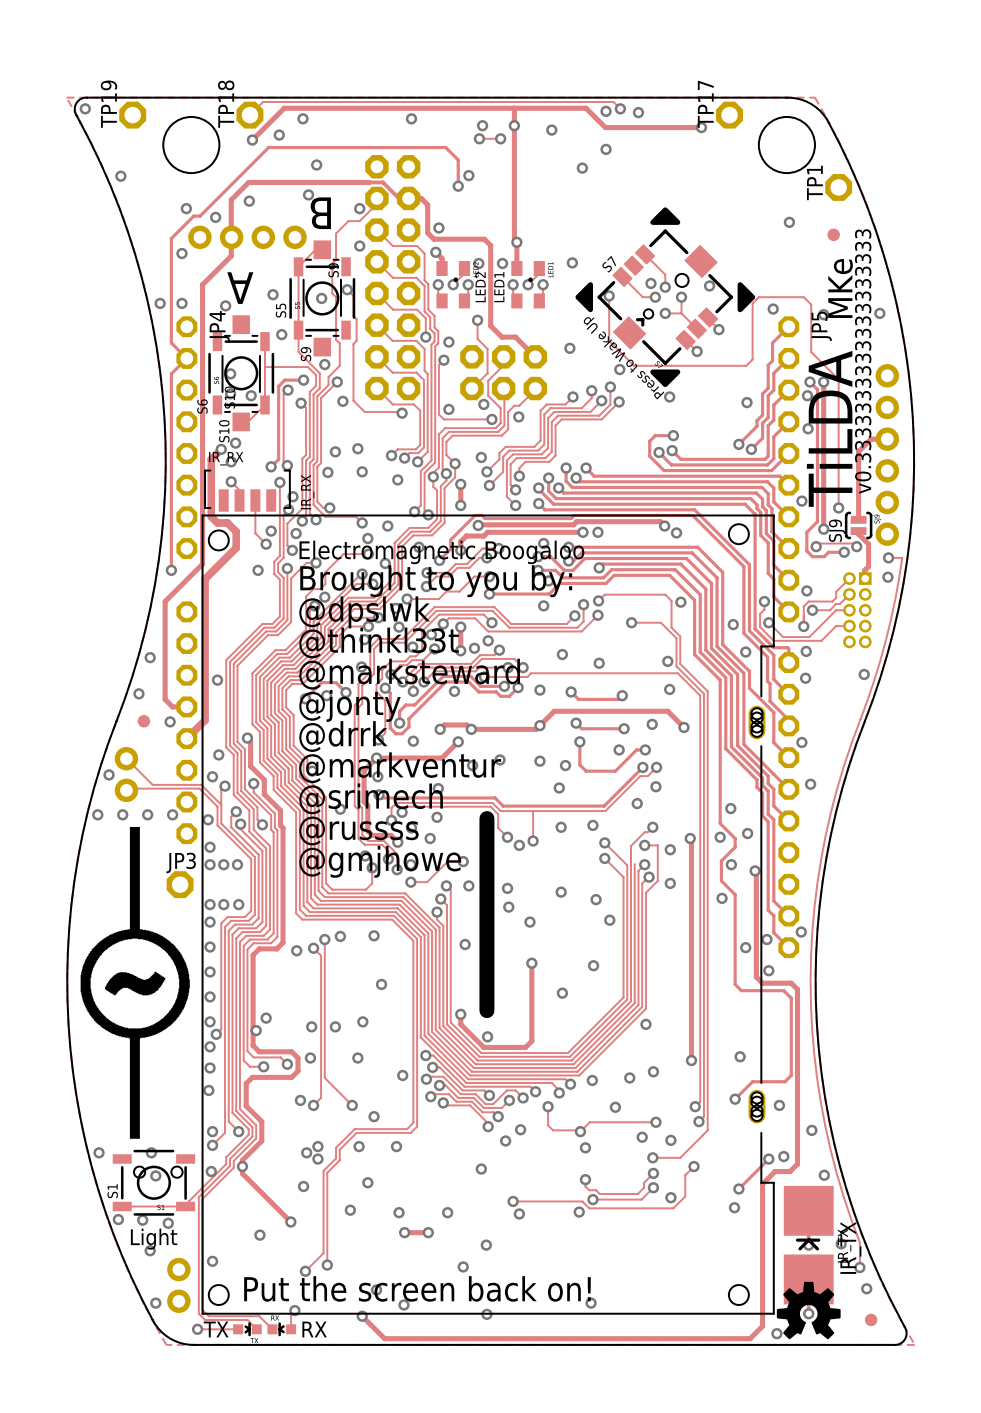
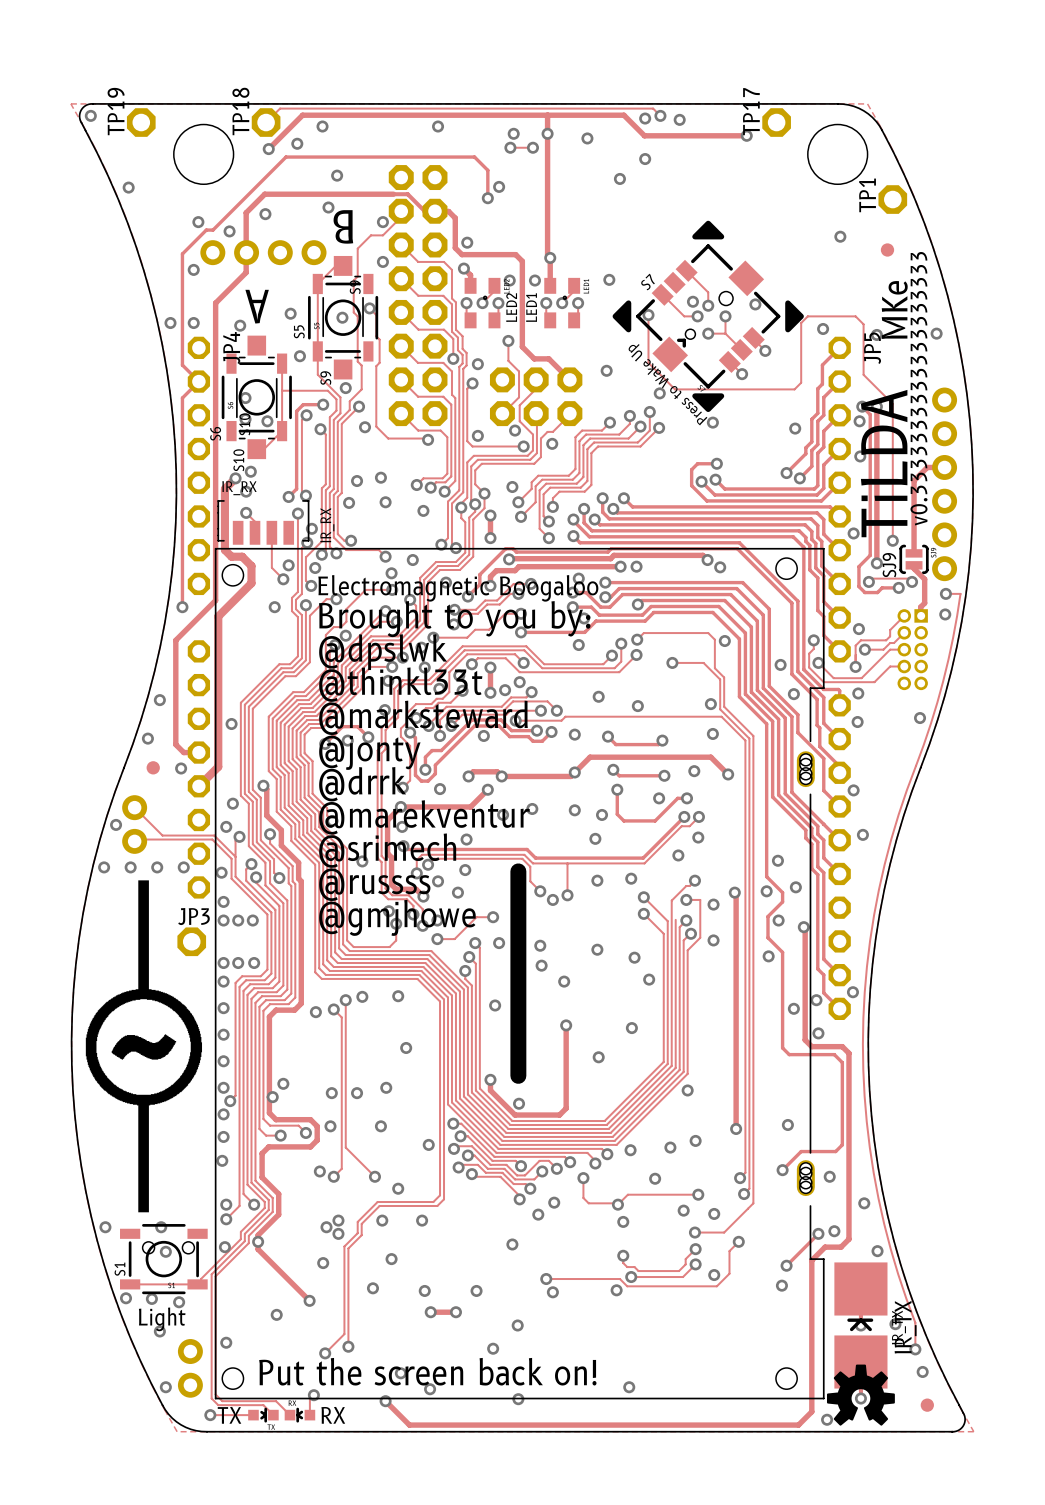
text: @markventur (400, 767) -> @marekventur (424, 817)

